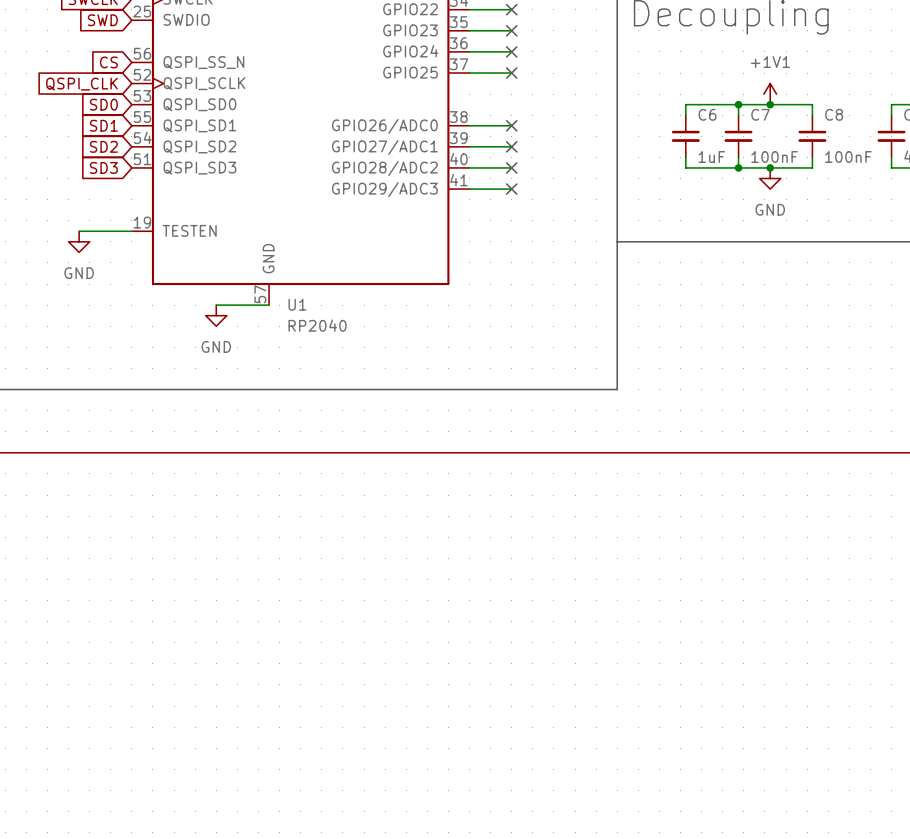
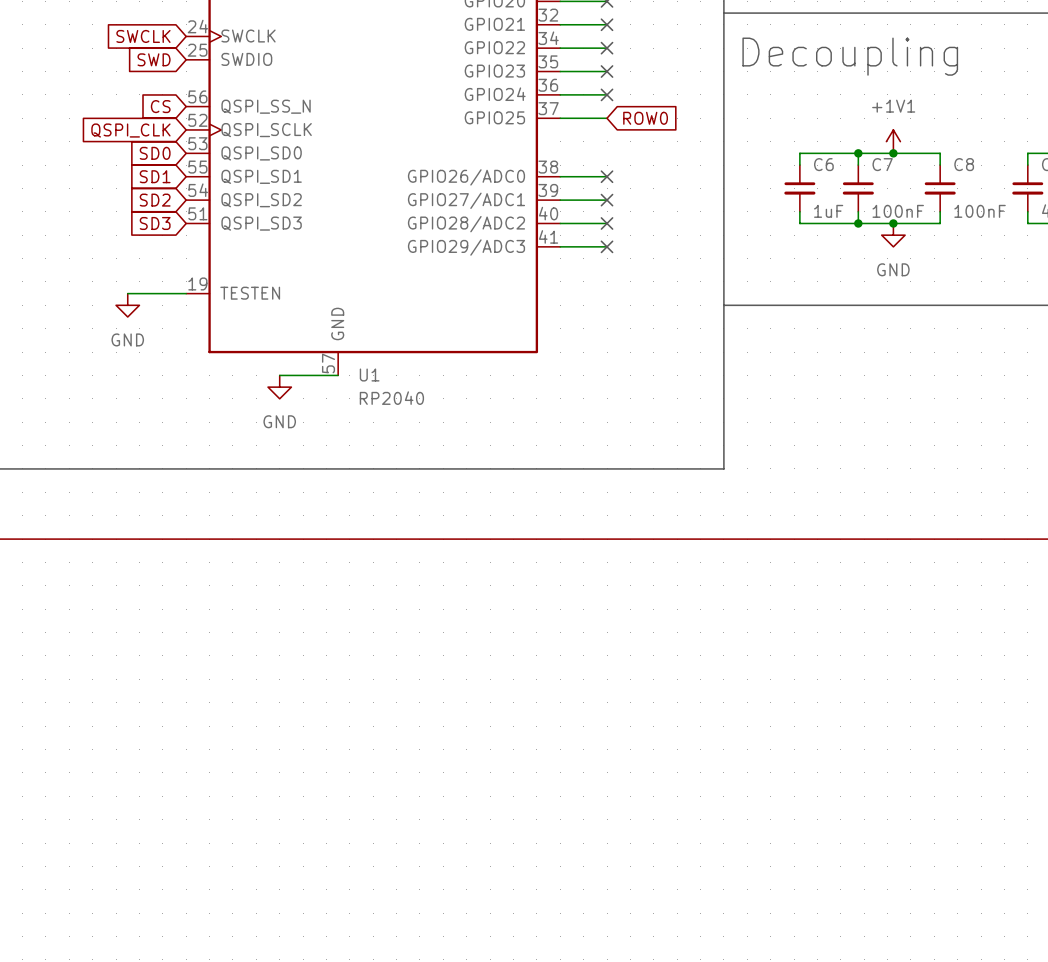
no-connect mark: (511, 73) -> none
global label: none -> ROW0 (645, 118)

